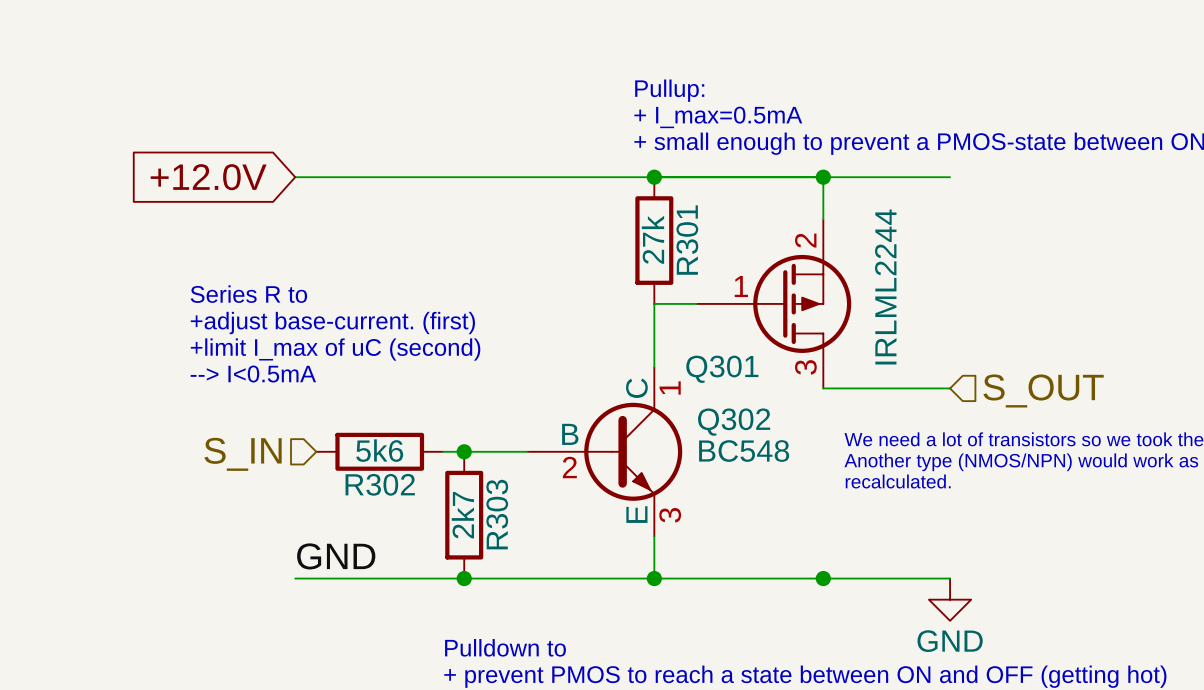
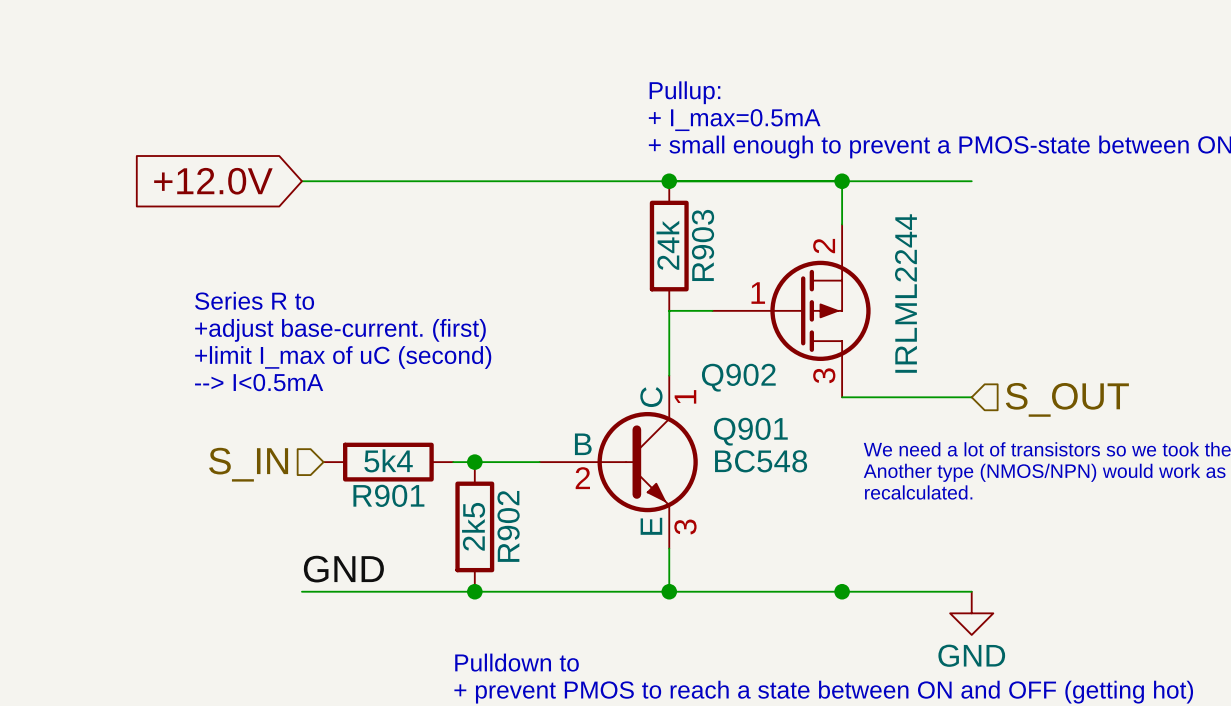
R301 value: 27k (652, 239) -> 24k (667, 245)
R301 name: R301 (687, 240) -> R903 (703, 245)
Q301 name: Q301 (722, 369) -> Q902 (738, 377)
Q302 name: Q302 (734, 422) -> Q901 (750, 431)
R302 value: 5k6 (379, 450) -> 5k4 (388, 460)
R302 name: R302 (380, 484) -> R901 (388, 495)
R303 name: R303 (497, 514) -> R902 (508, 526)
R303 value: 2k7 (462, 515) -> 2k5 (473, 526)

